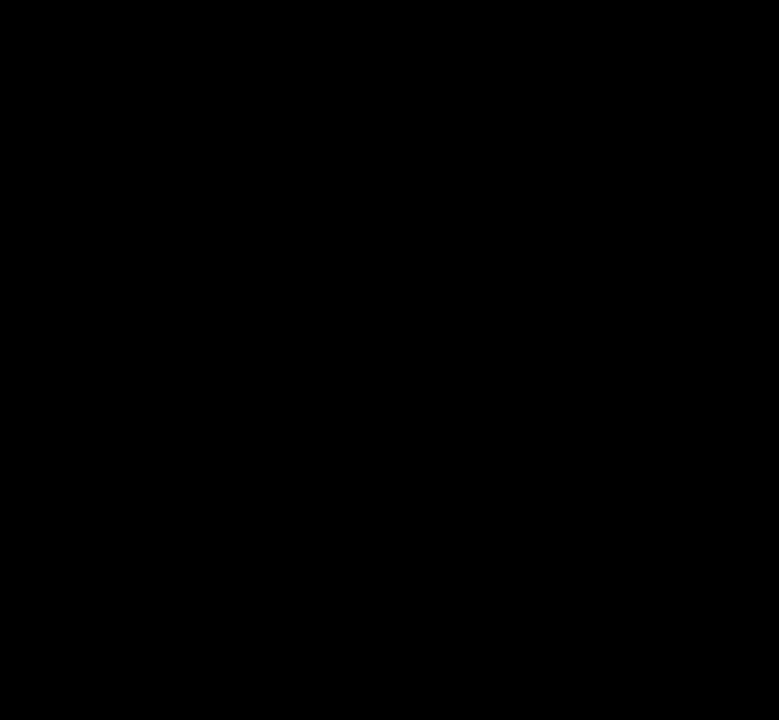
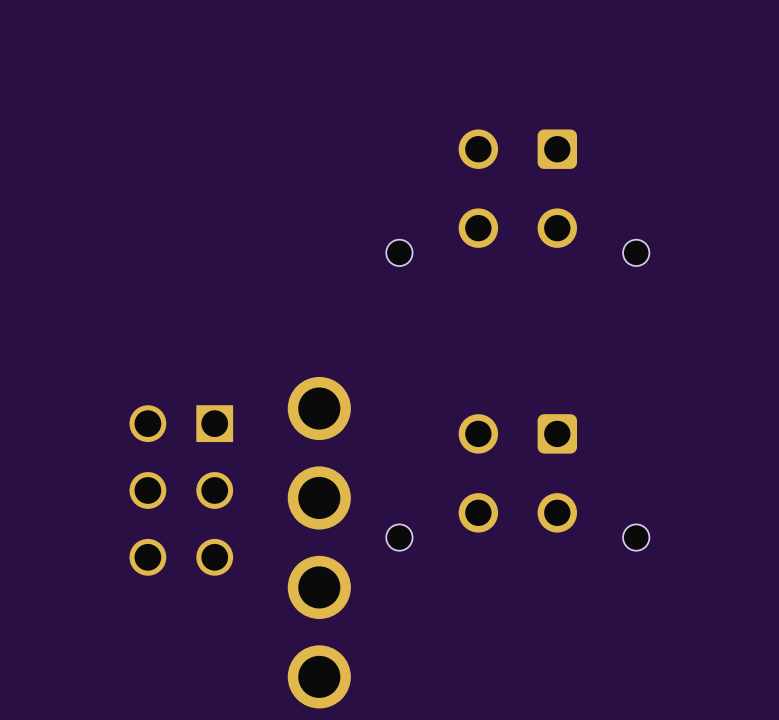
part: none -> (517, 197)
part: none -> (319, 408)
part: none -> (517, 482)
part: none -> (181, 490)
part: none -> (319, 497)
part: none -> (319, 587)
part: none -> (319, 676)

